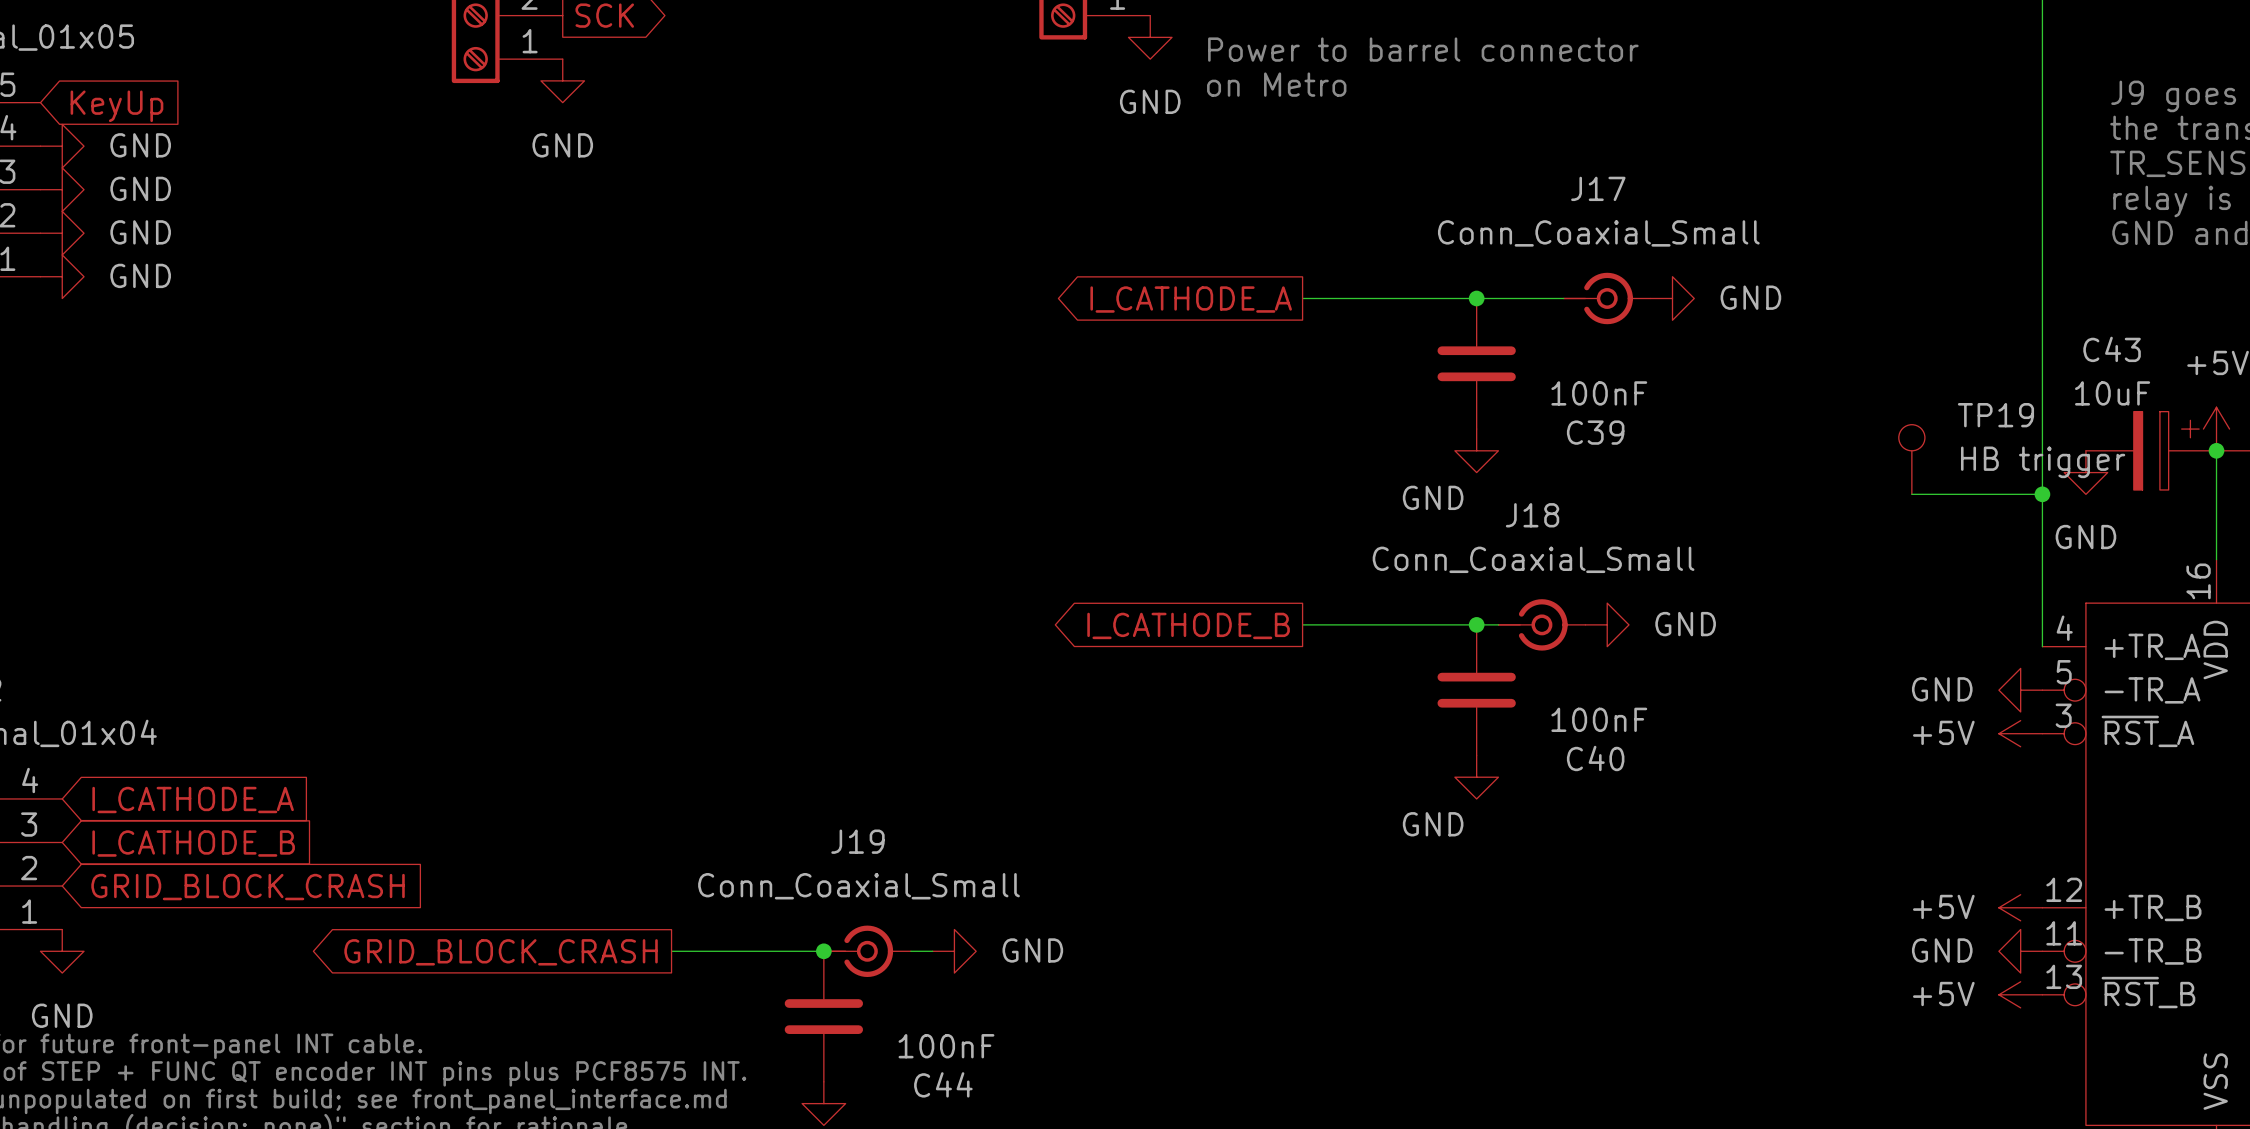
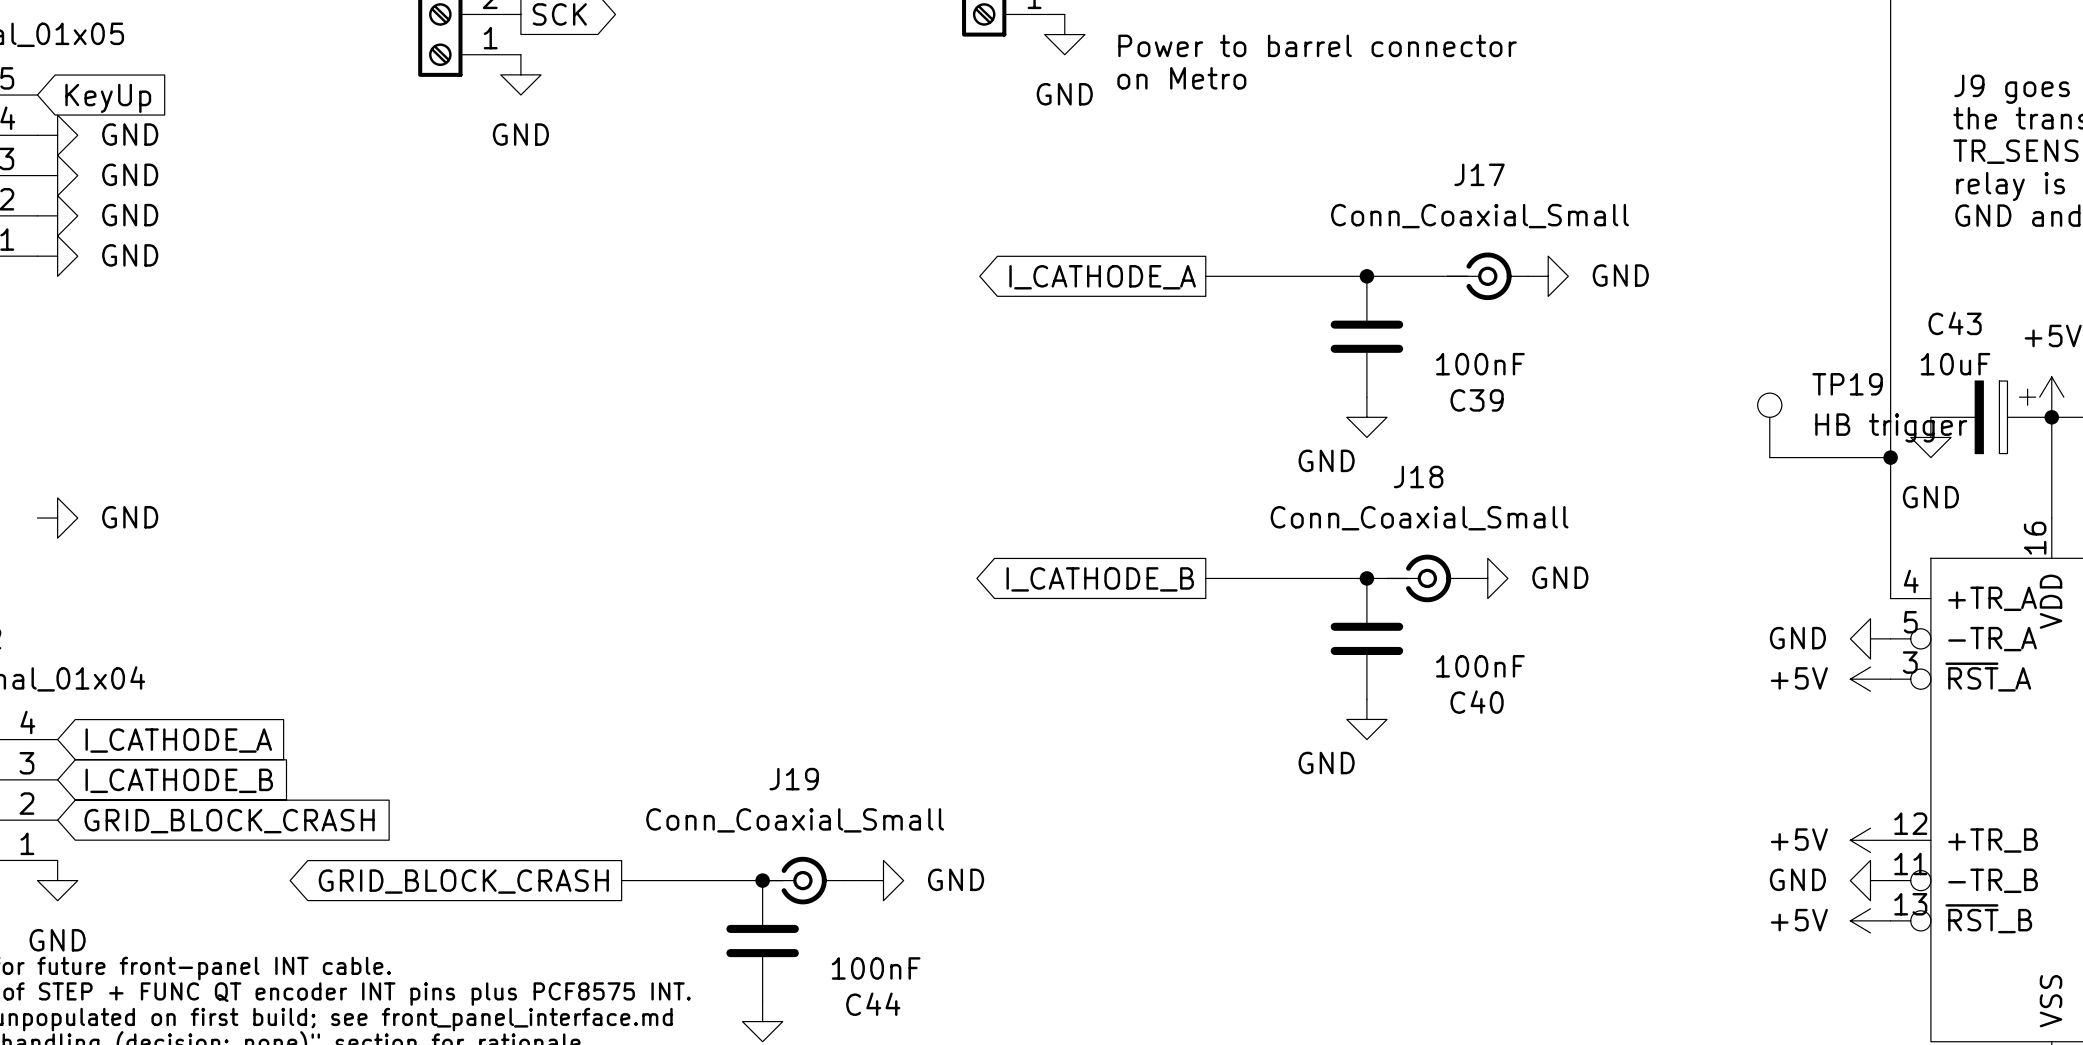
power symbol: none -> GND (57, 518)

